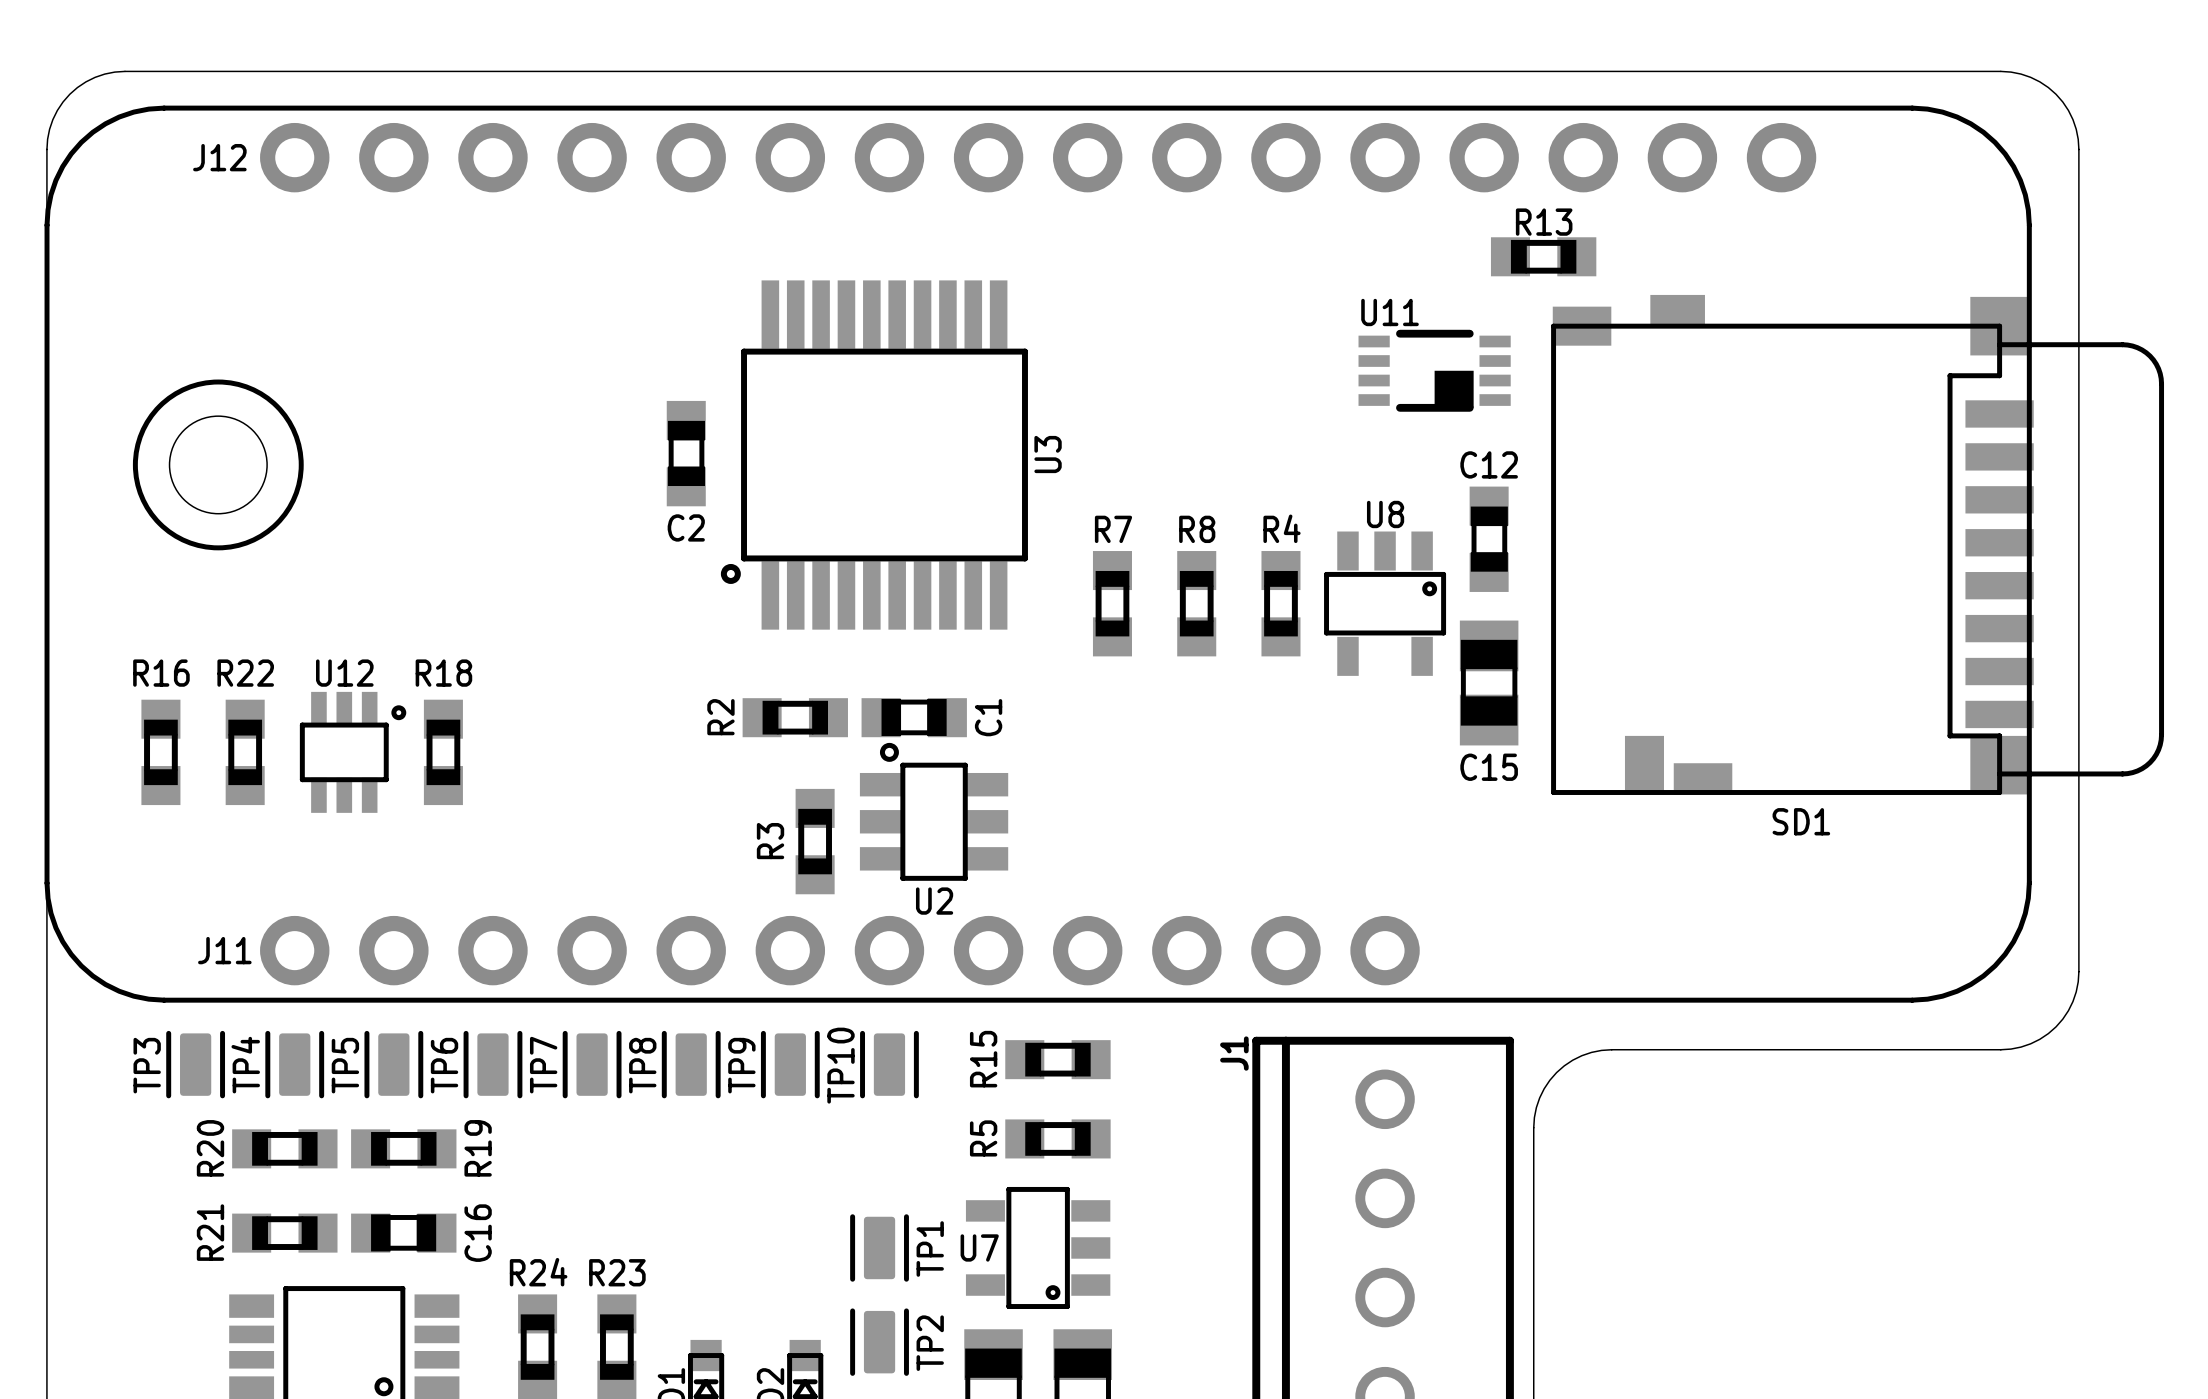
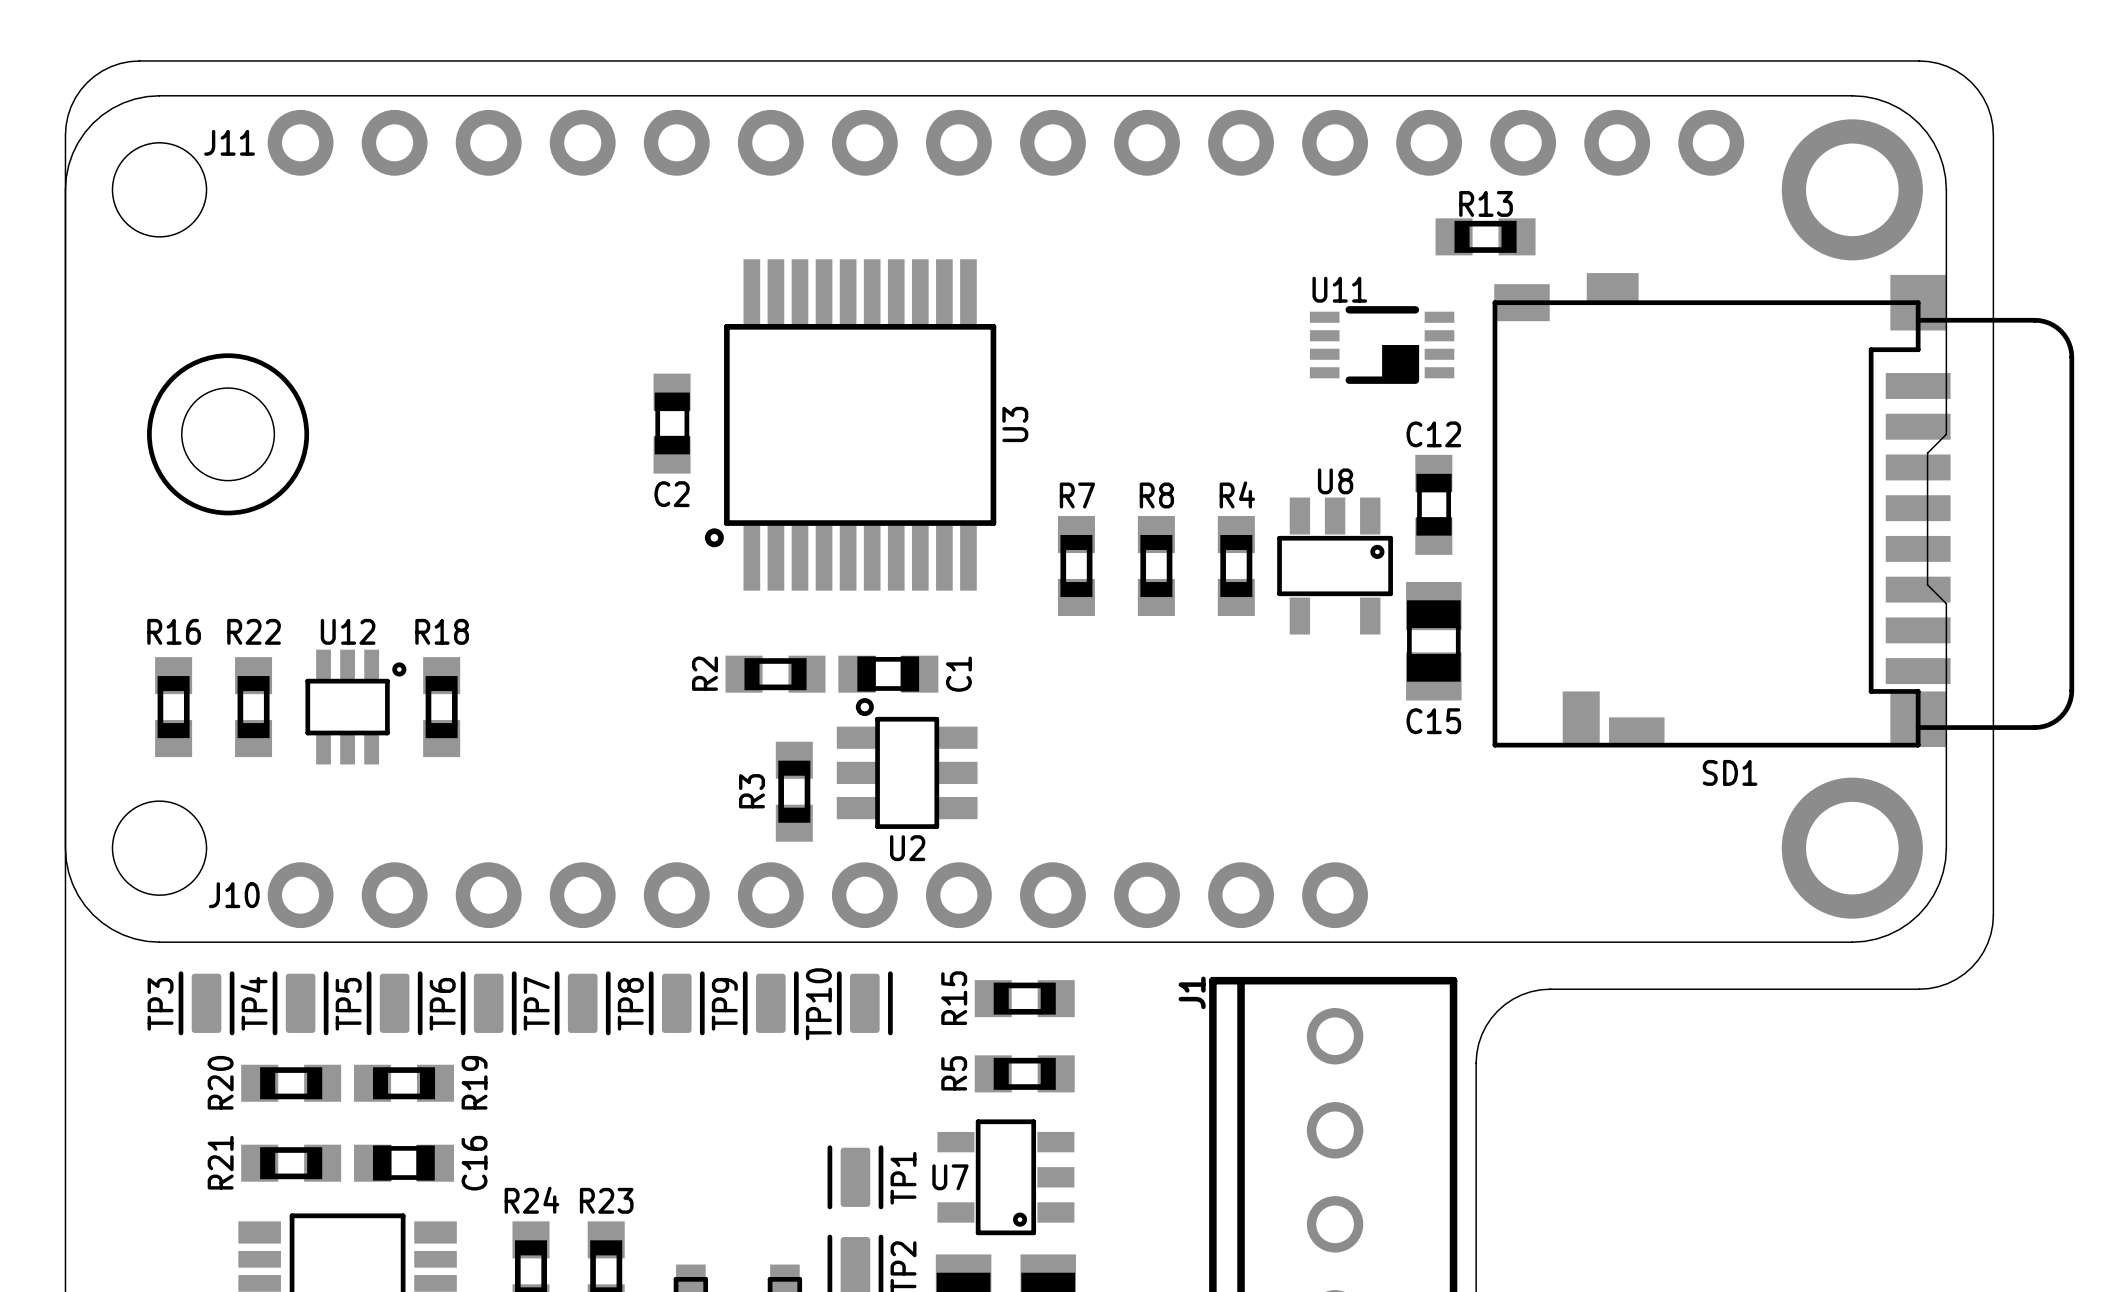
part footprint: [44, 105, 2032, 1003] -> [65, 95, 1947, 943]
text: J12 (219, 157) -> J11 (229, 142)
text: J11 (224, 950) -> J10 (234, 895)

